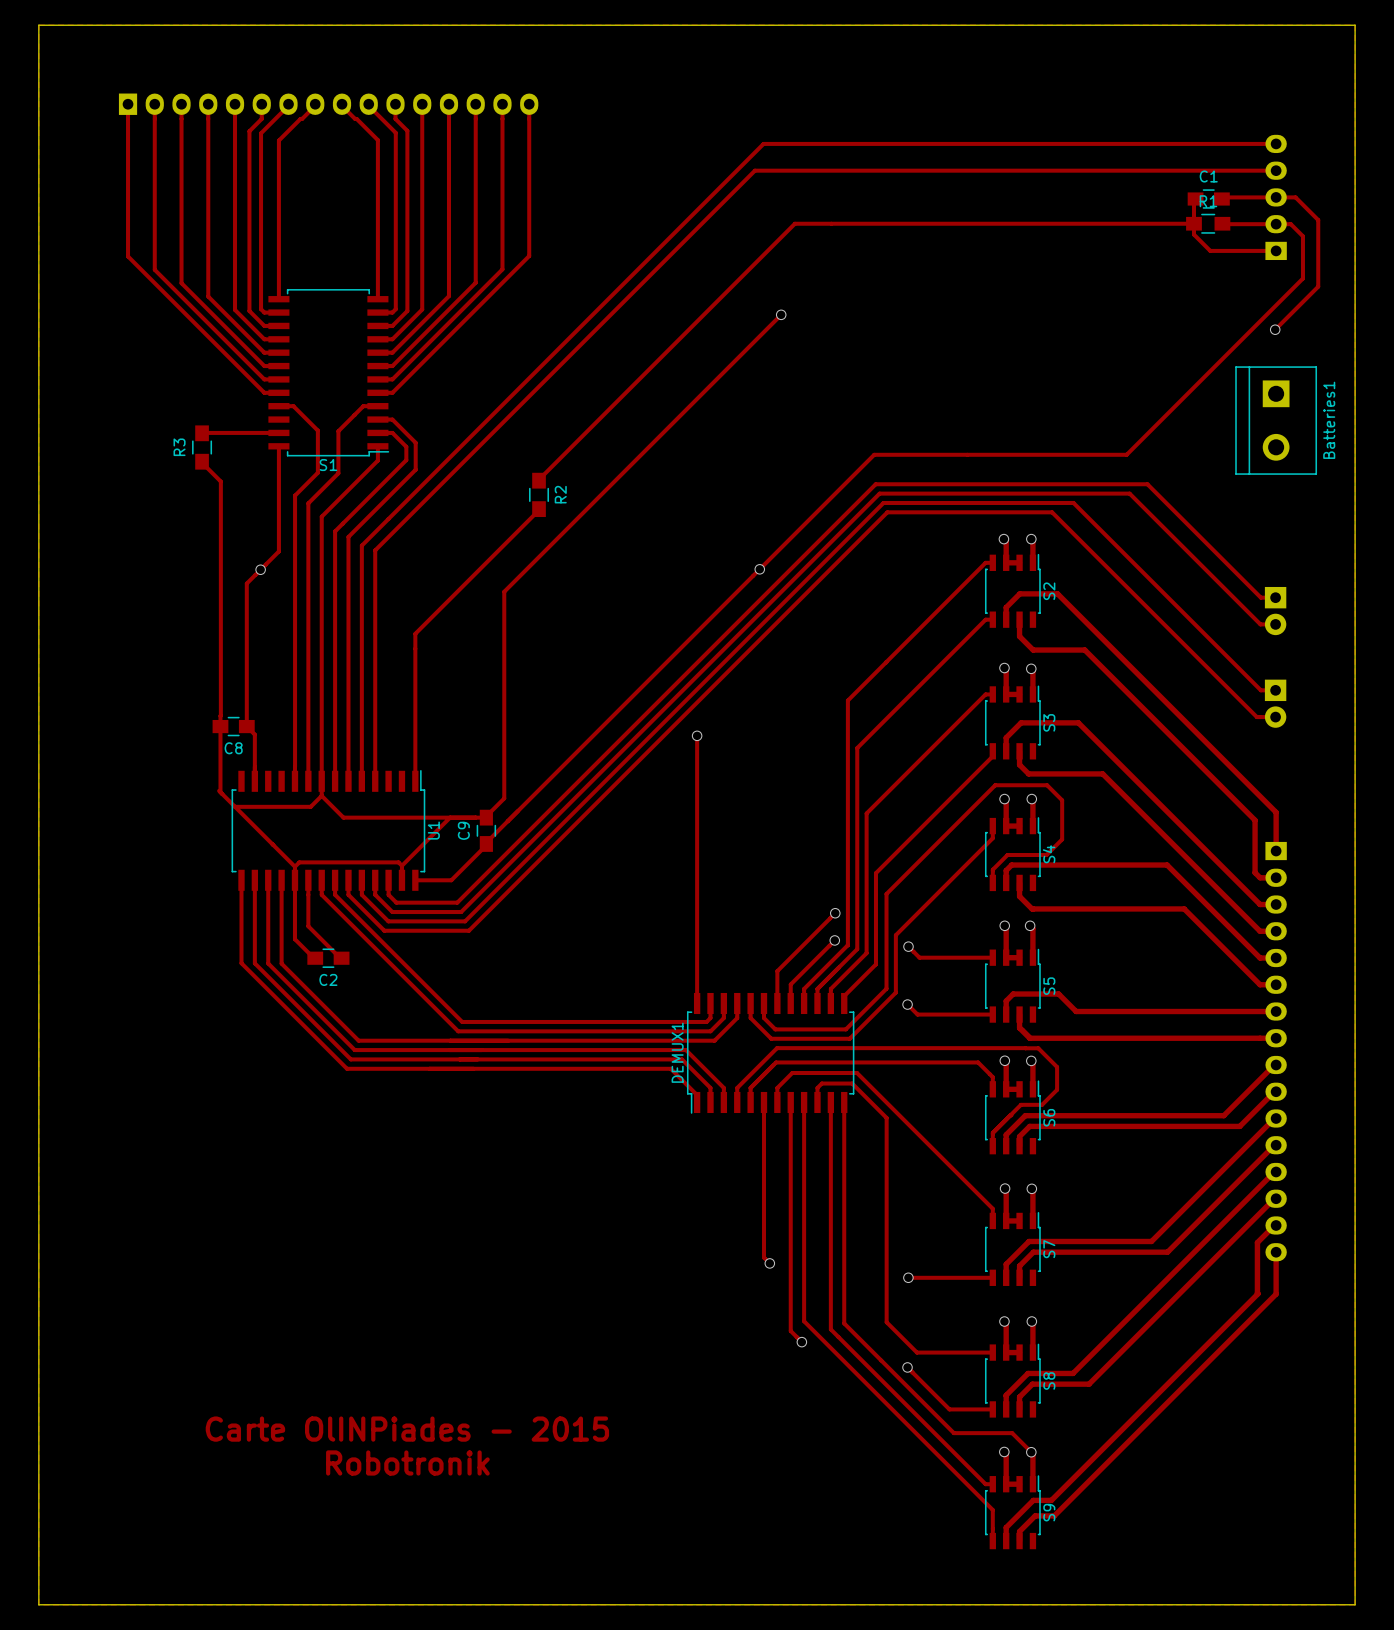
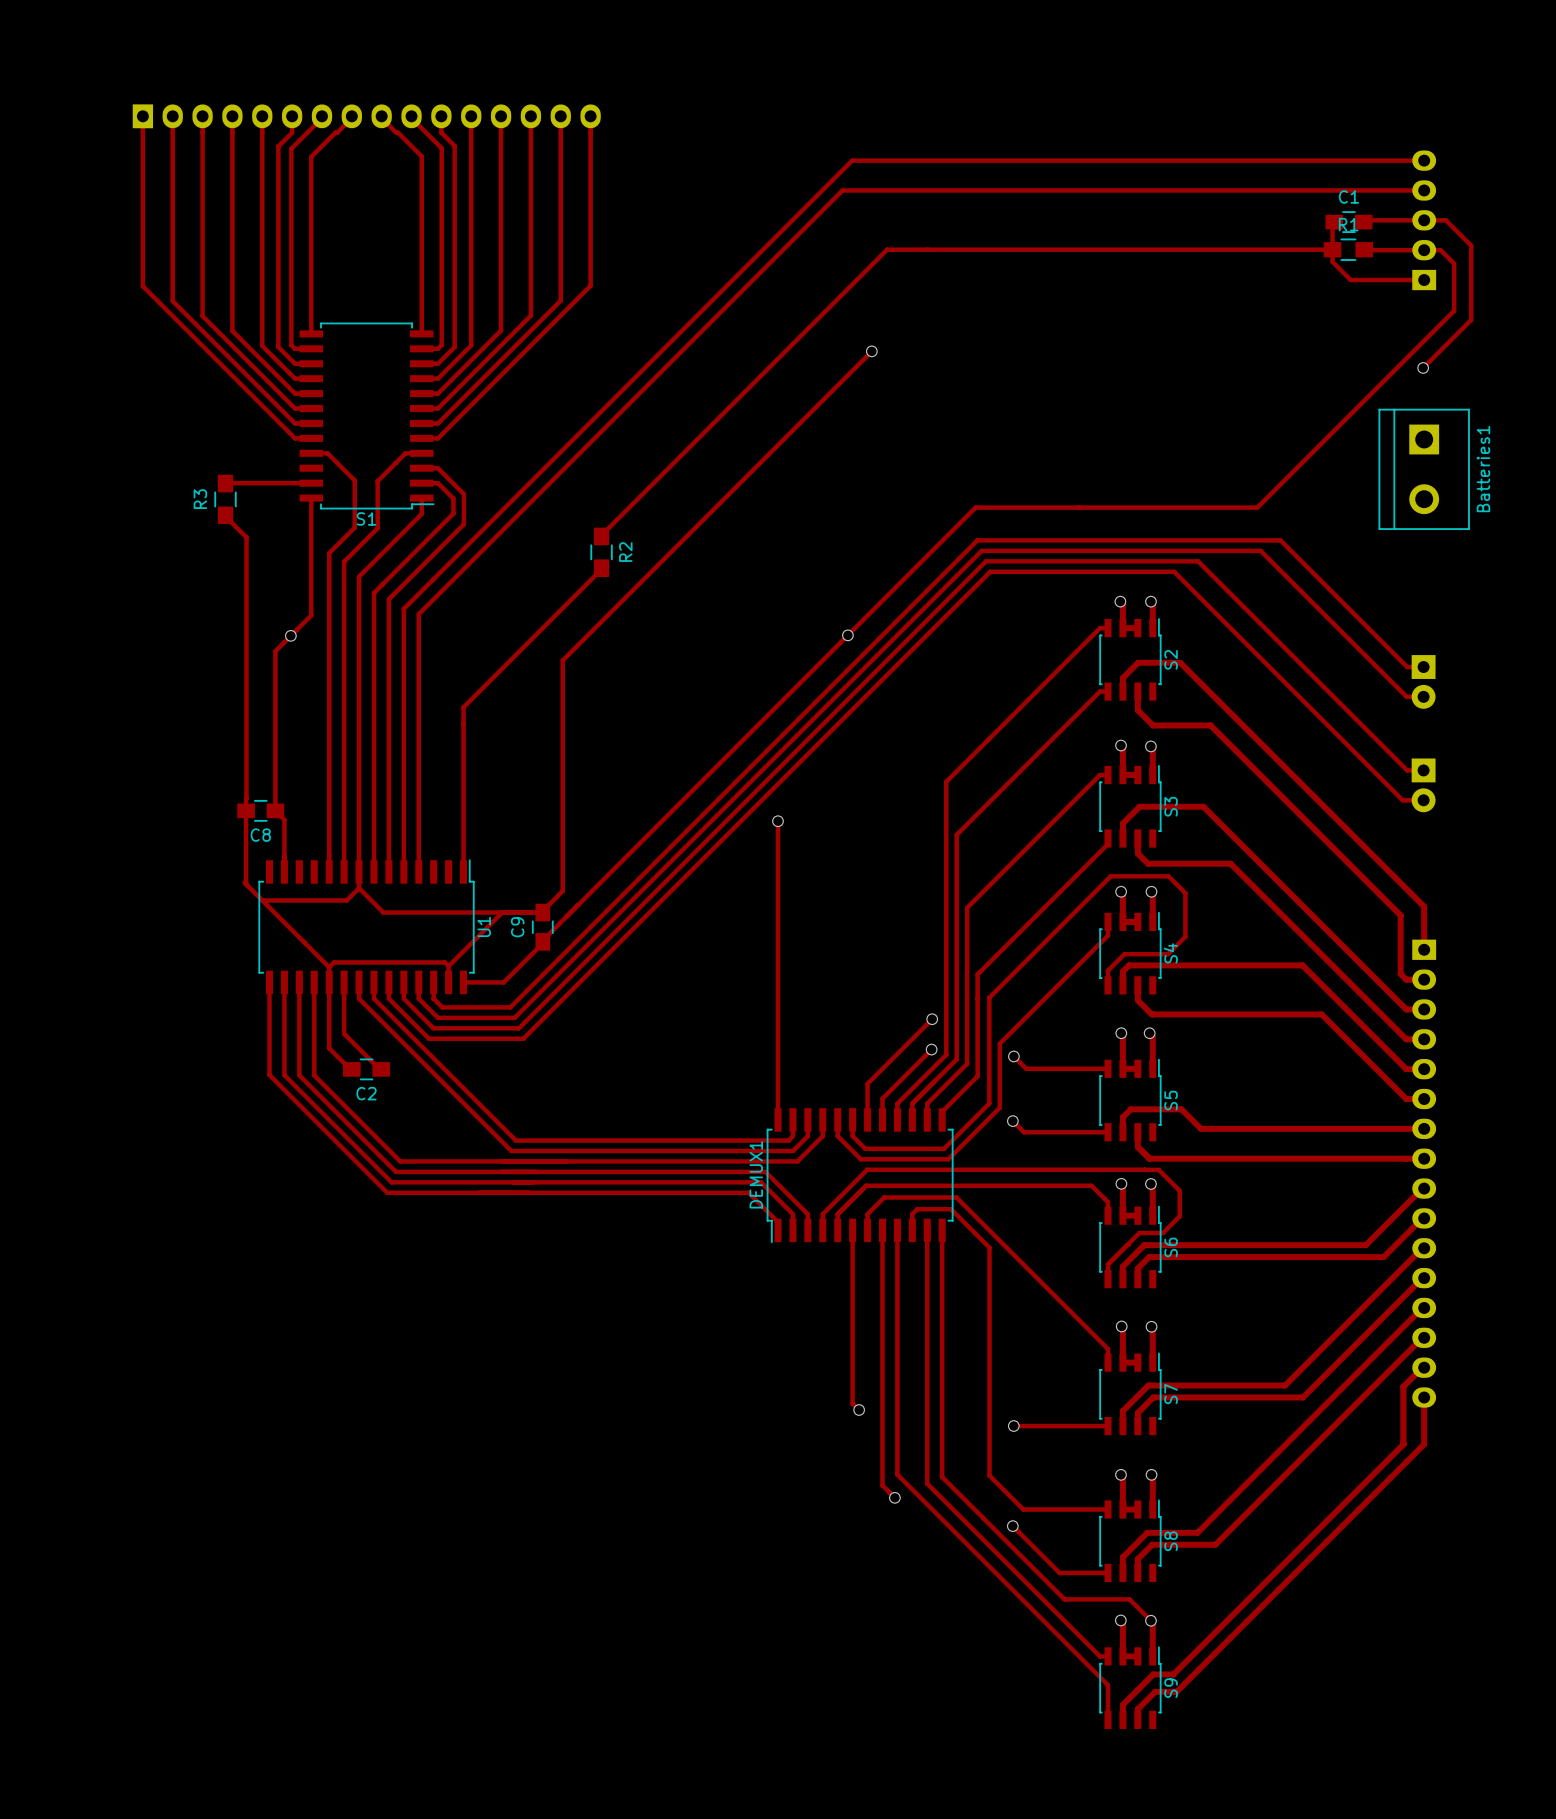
board edge: (38, 25) (1355, 25) (1355, 1604) (38, 1604) (38, 25) -> none
text: Carte OlINPiades - 2015 (407, 1429) -> none
text: Robotronik (407, 1462) -> none

